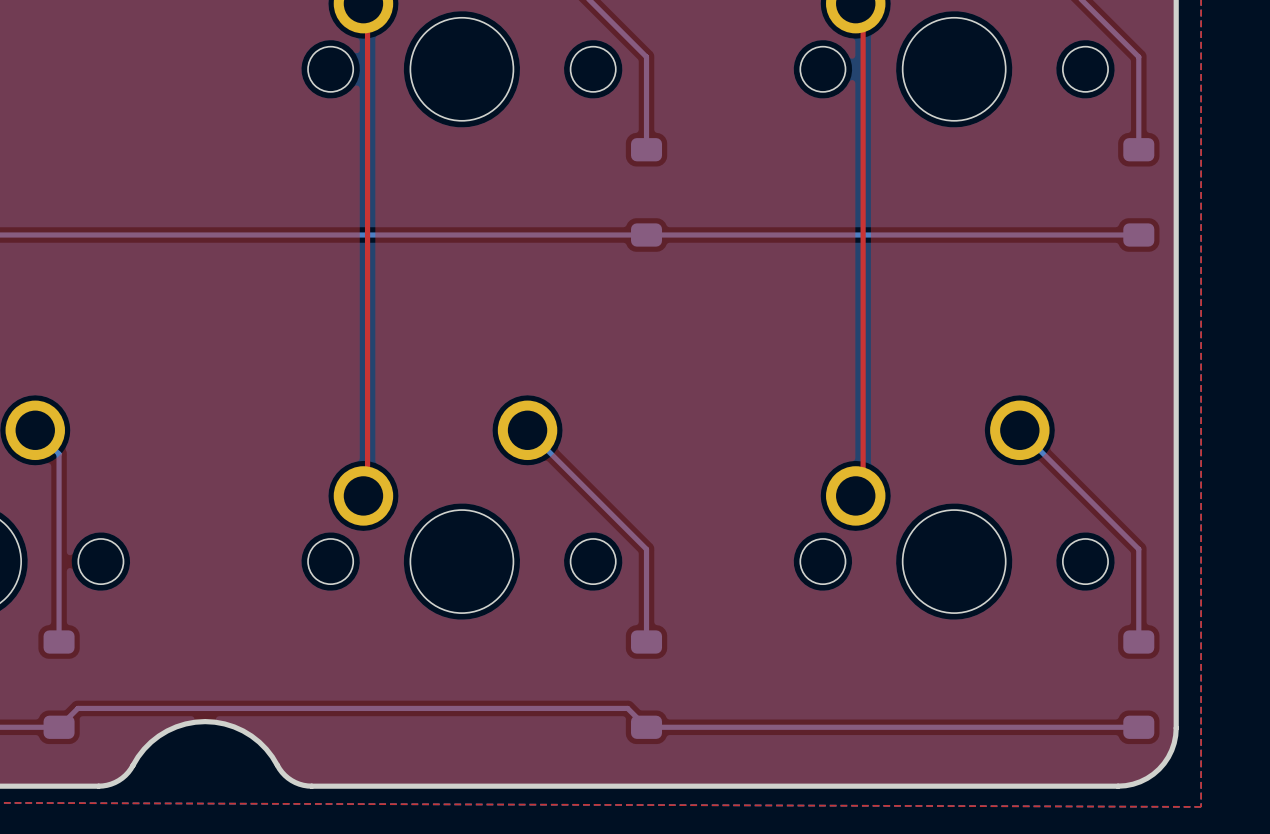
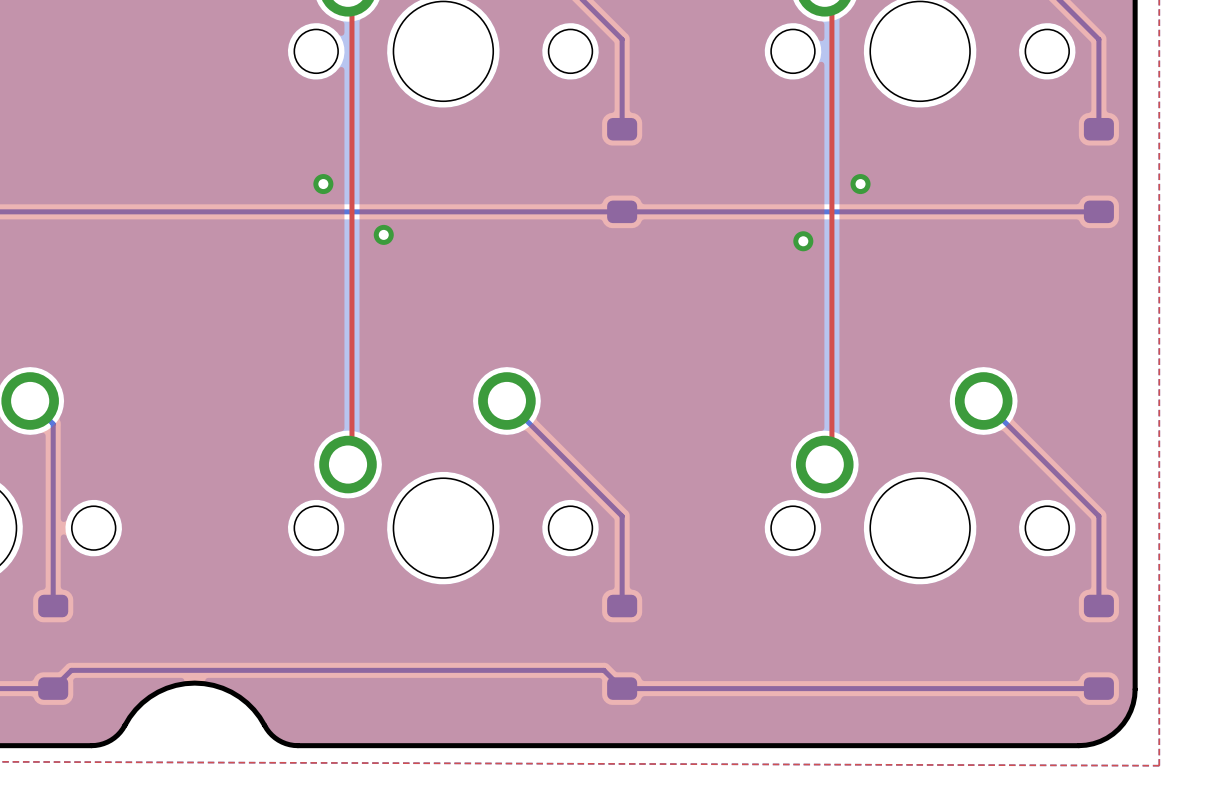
via: none -> (323, 184)
via: none -> (860, 184)
via: none -> (383, 234)
via: none -> (803, 241)

